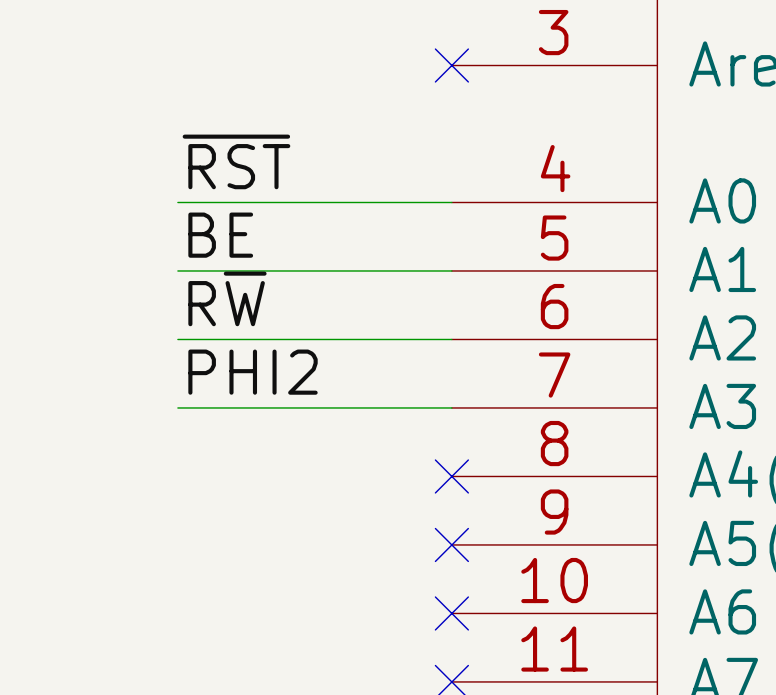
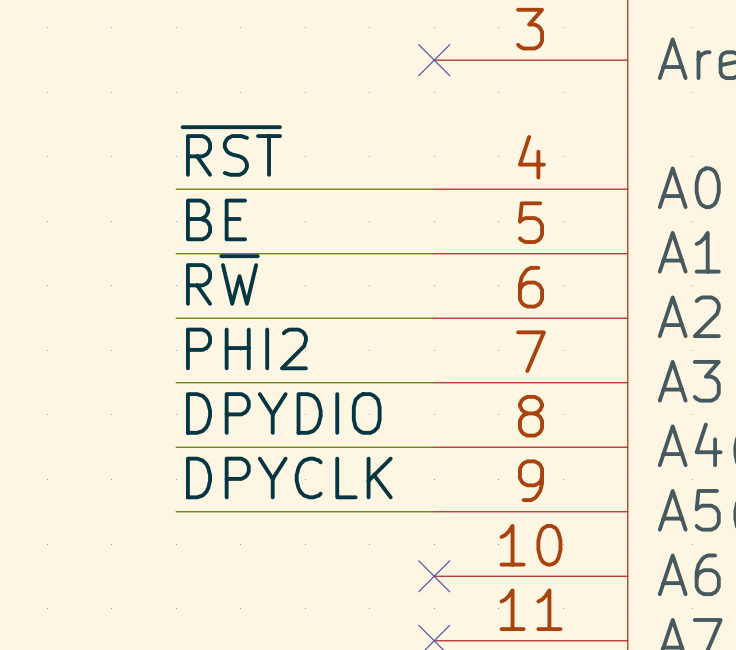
label: none -> DPYDIO (283, 413)
wire: none -> (176, 447) (434, 447)
no-connect mark: (451, 476) -> none
label: none -> DPYCLK (289, 477)
wire: none -> (176, 511) (434, 511)
no-connect mark: (451, 544) -> none

